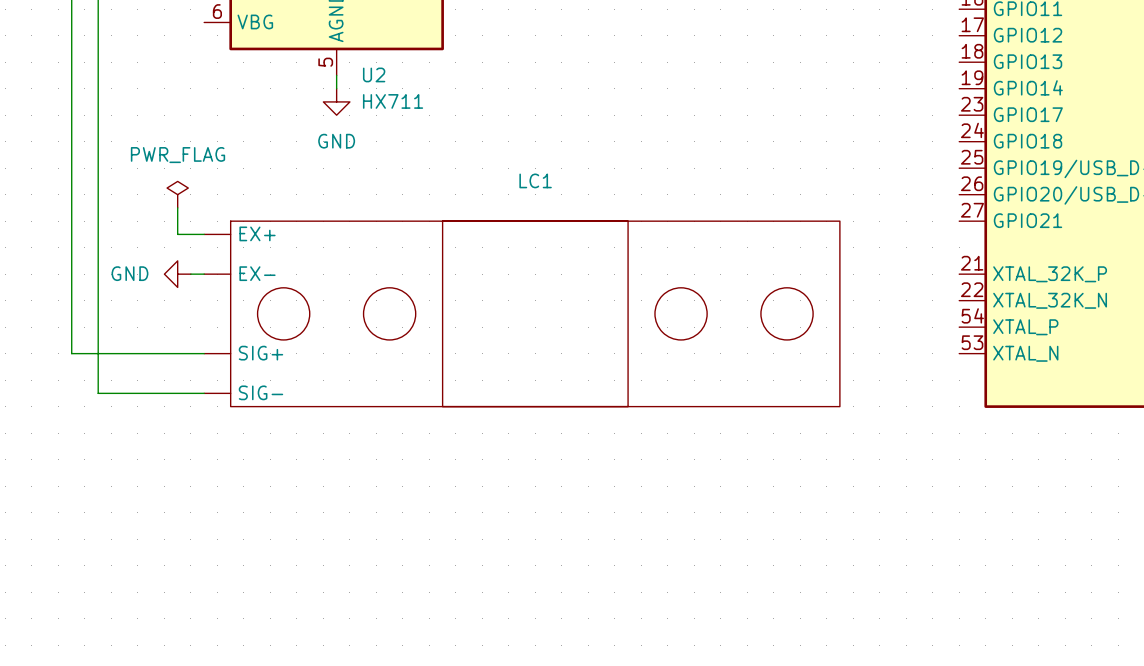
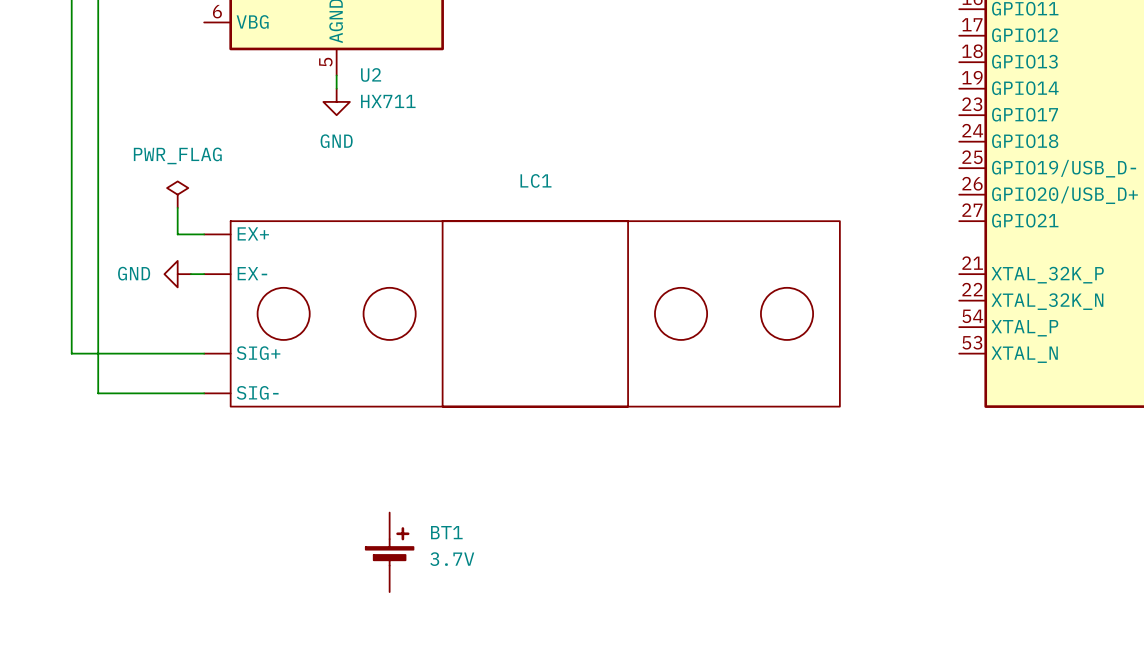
BT1: none -> 3.7V (389, 552)

